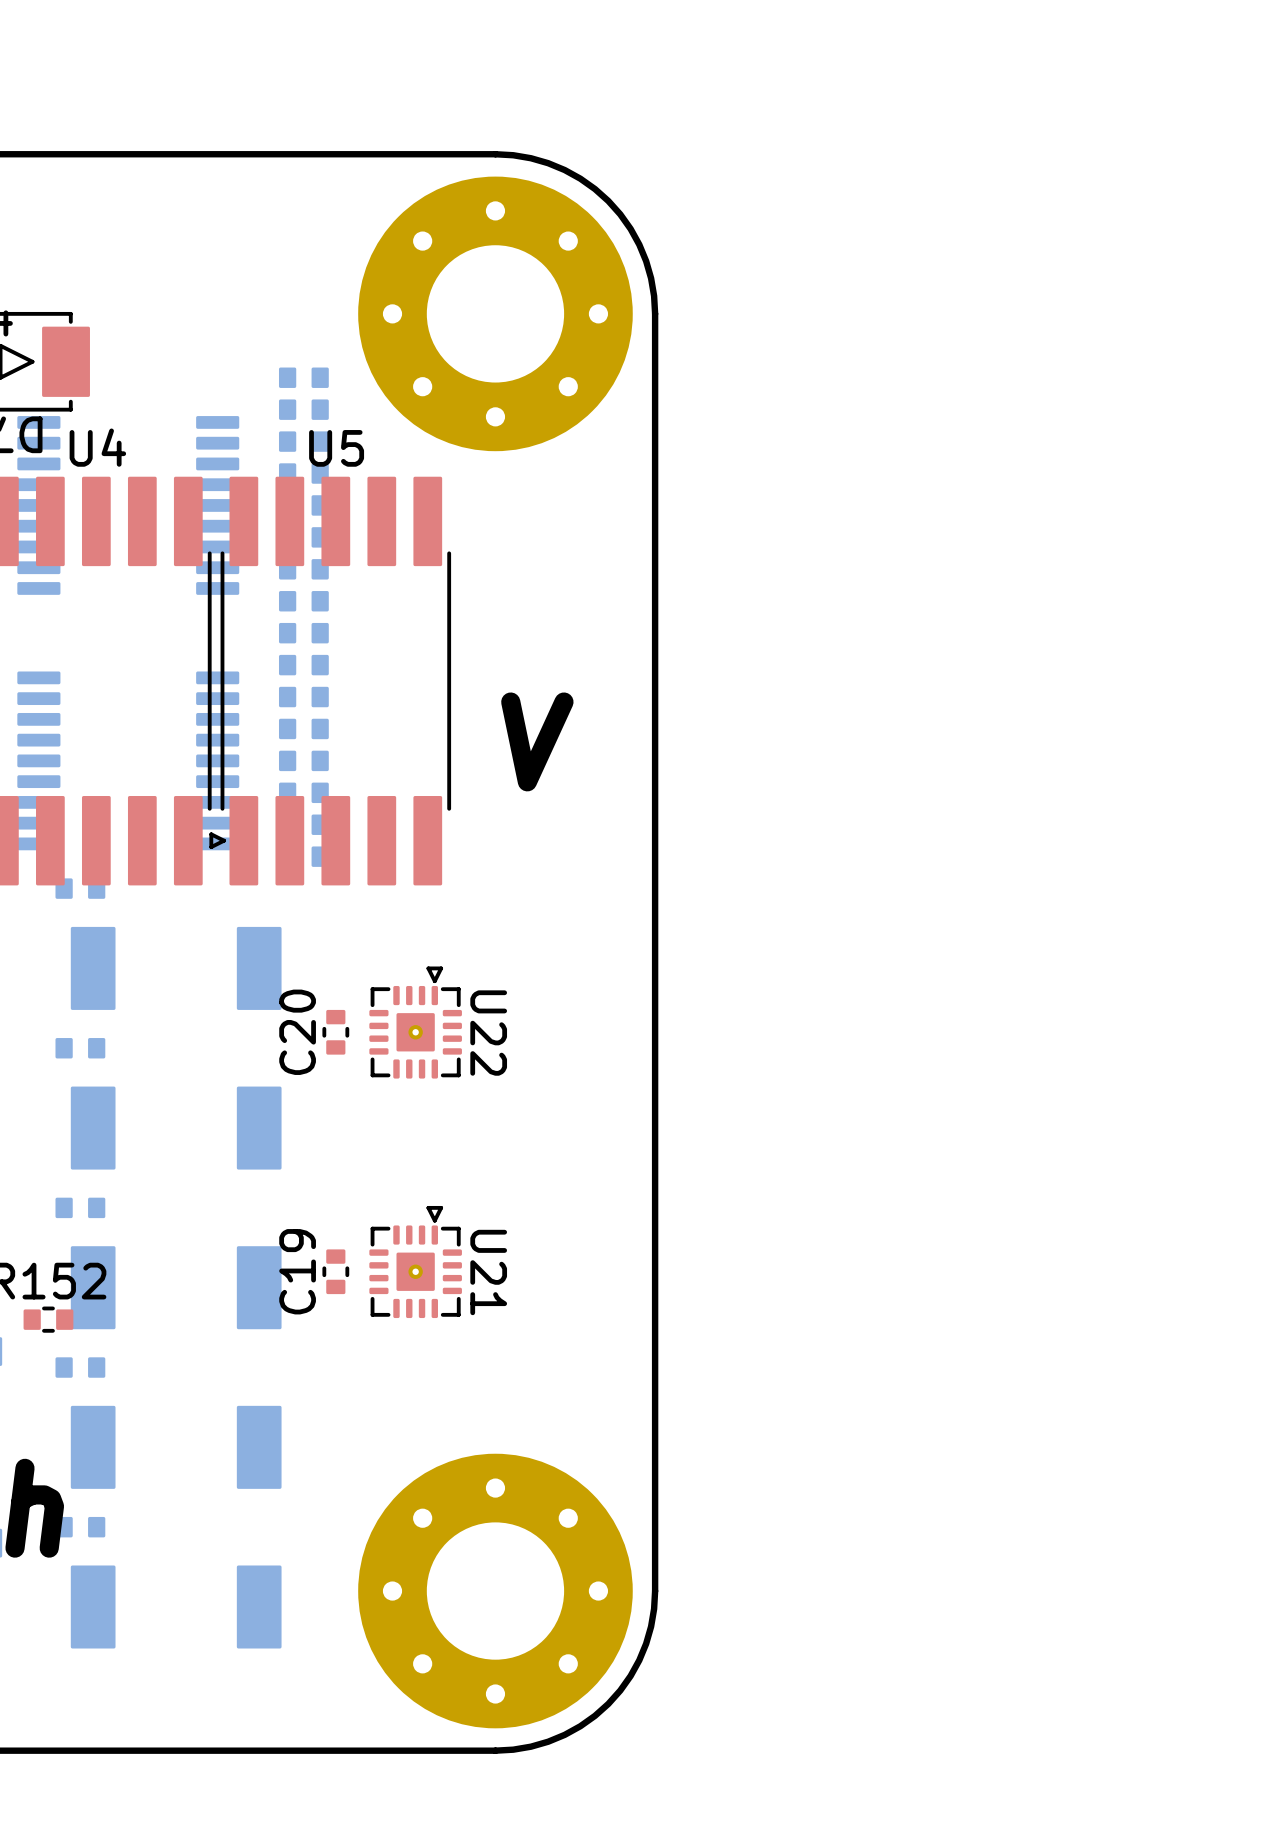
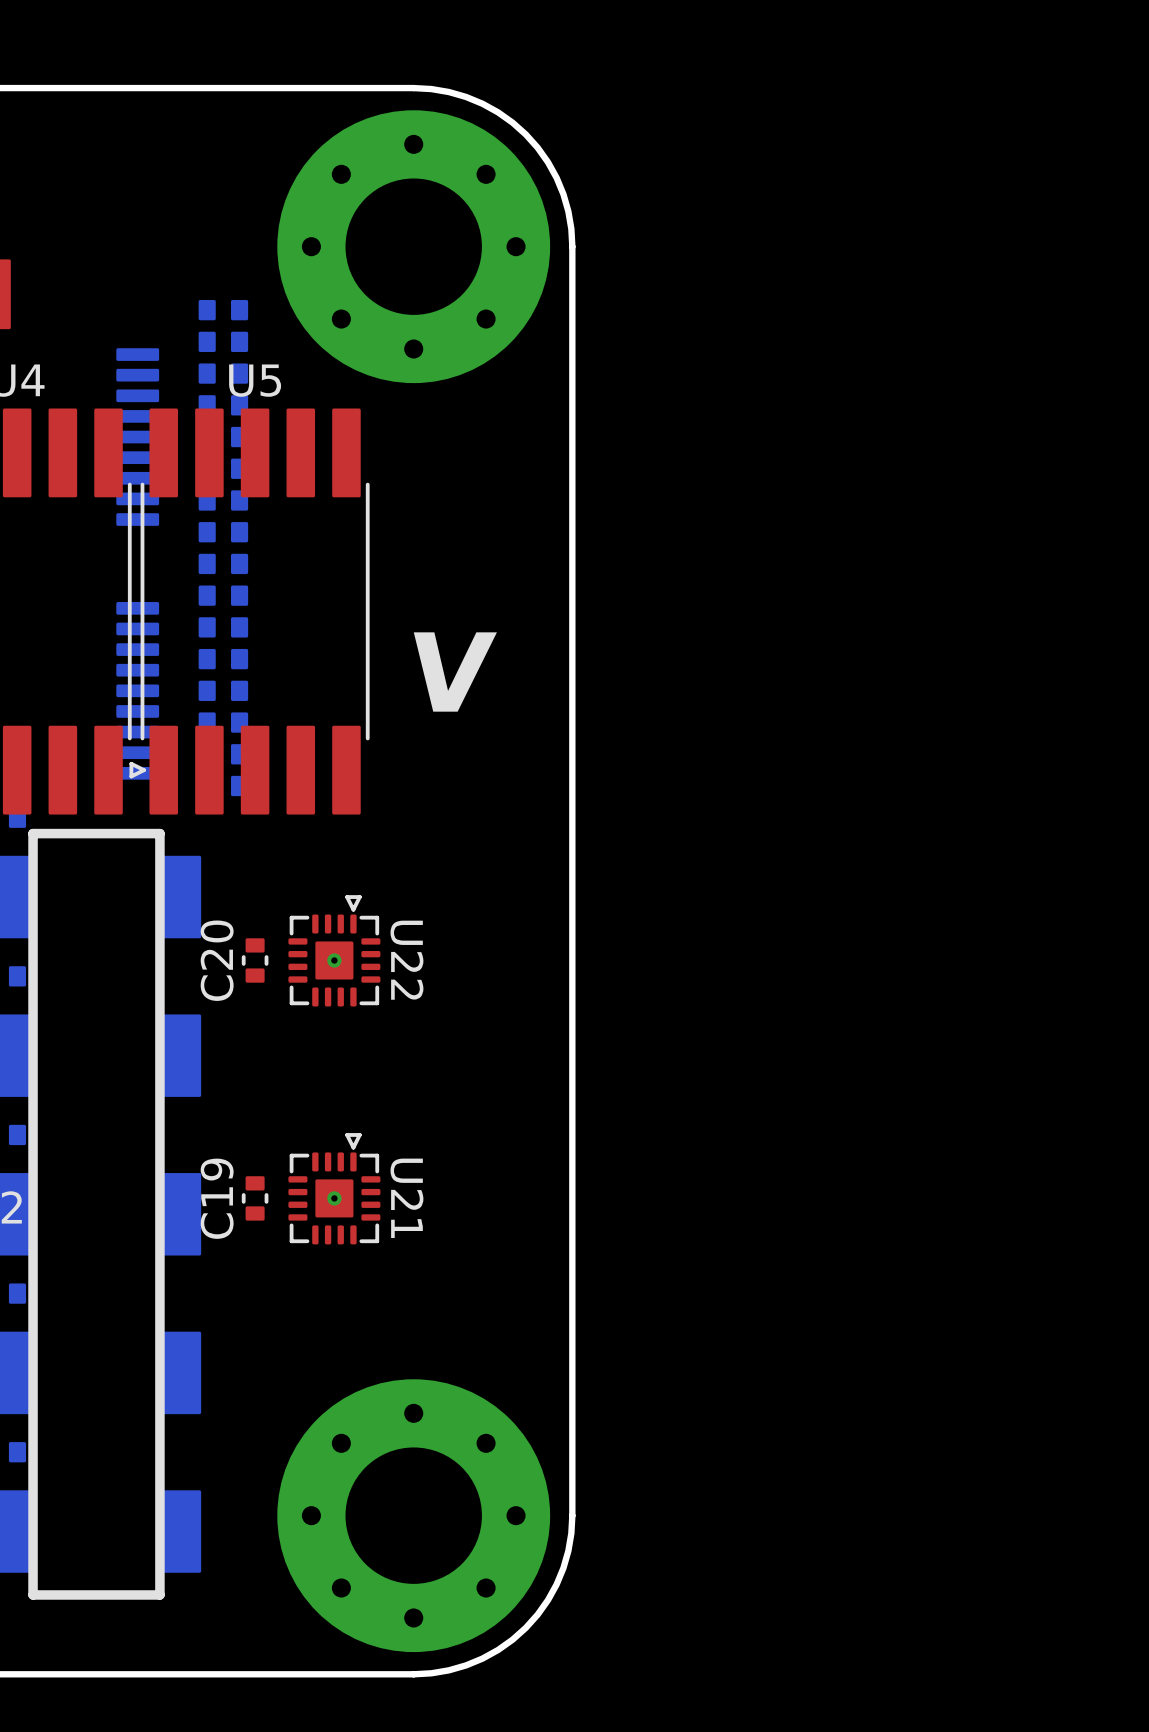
line: none -> (33, 833) (159, 833) (159, 1594) (33, 1594) (33, 833)

